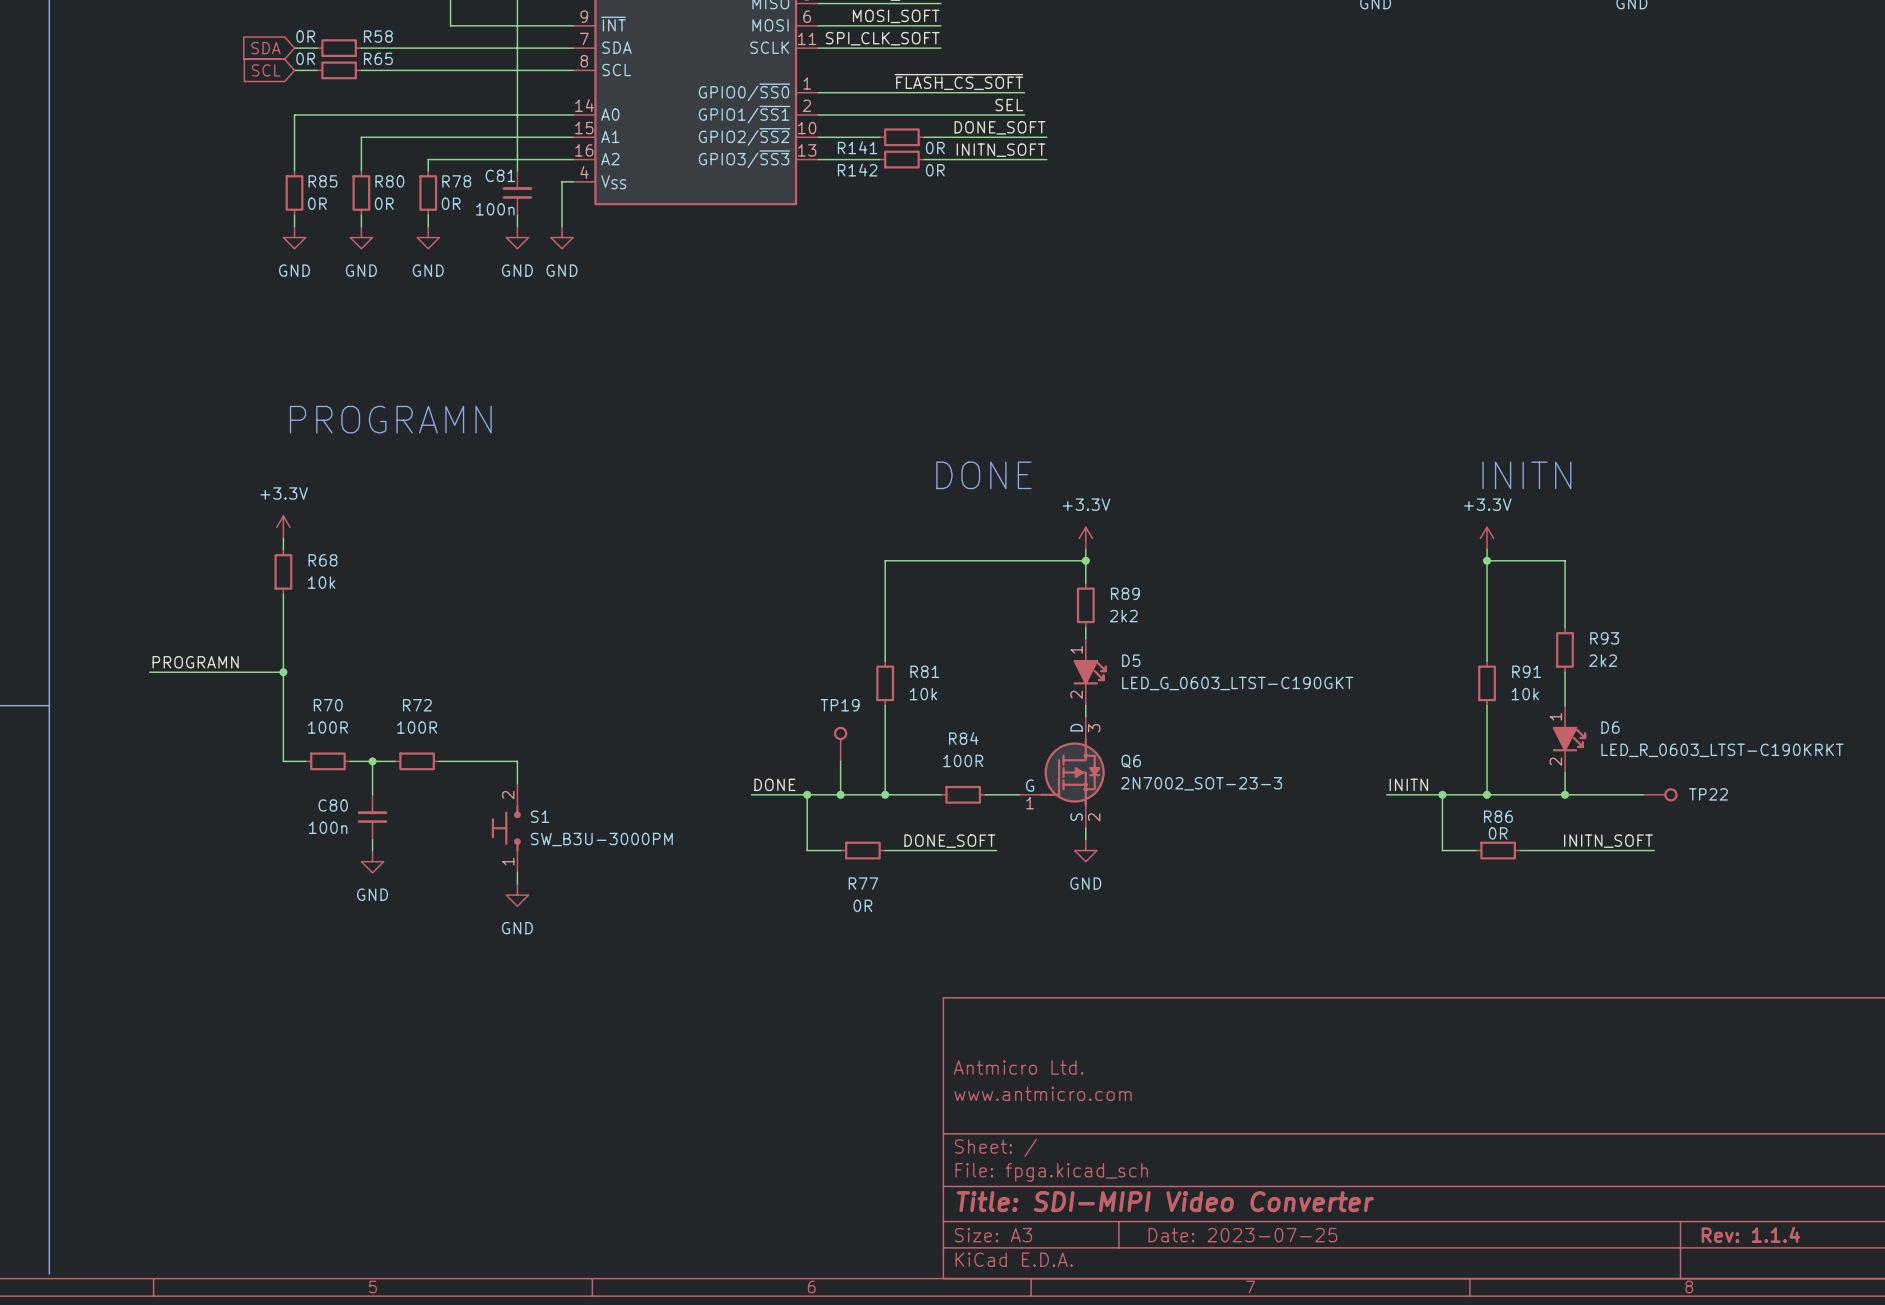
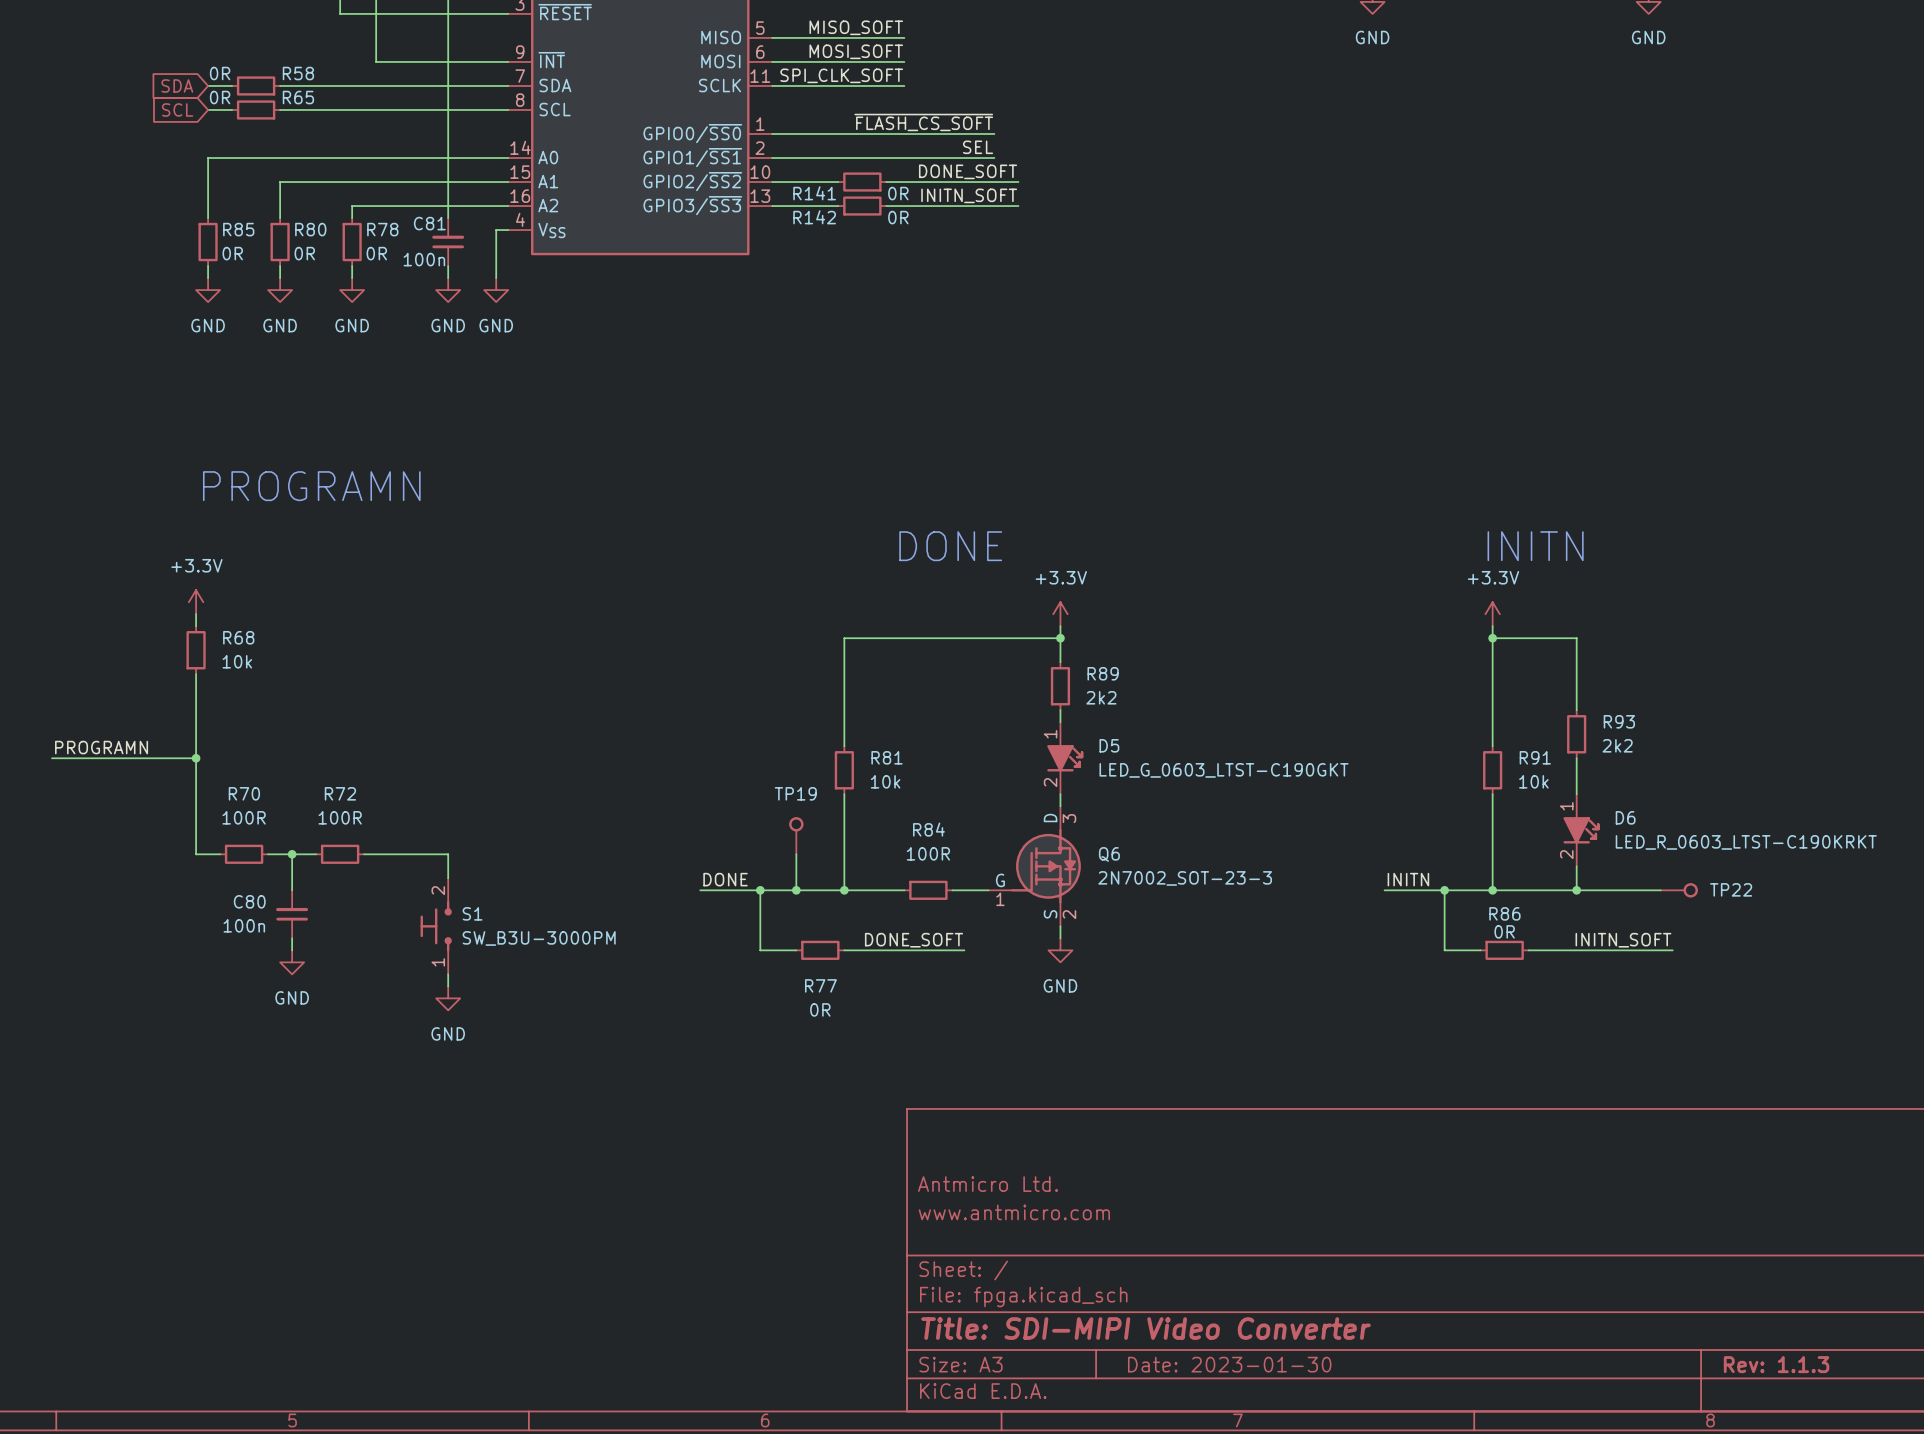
title block: Rev: 1.1.4 (1750, 1234) -> Rev: 1.1.3 (1776, 1364)
title block: Date: 2023-07-25 (1242, 1235) -> Date: 2023-01-30 (1229, 1364)

